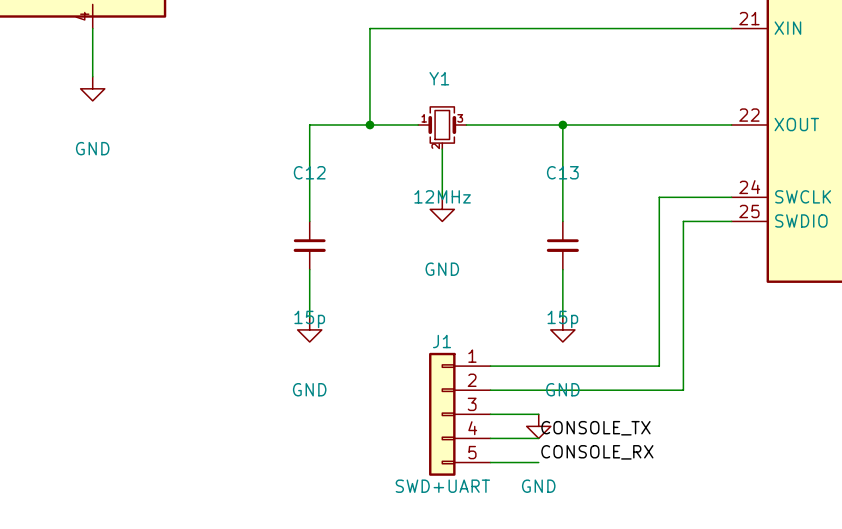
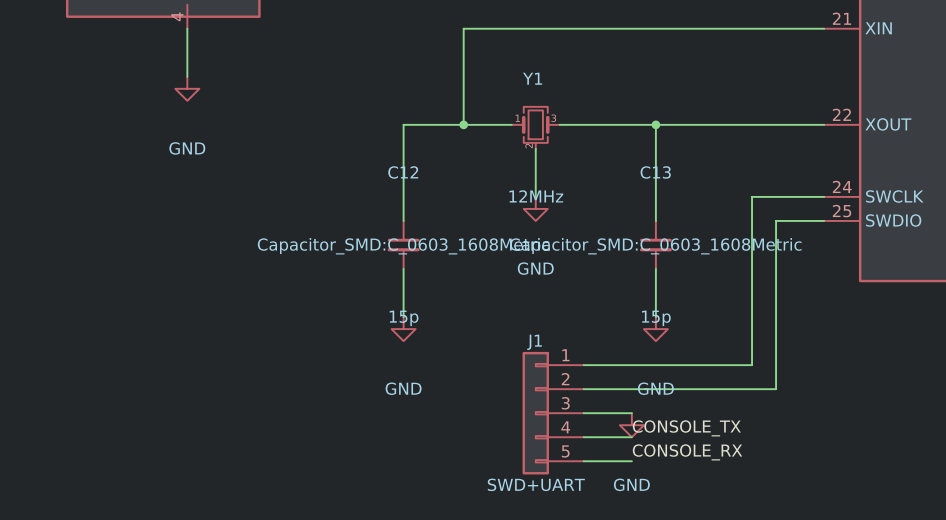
C12 text: none -> Capacitor_SMD:C_0603_1608Metric (403, 246)
C13 text: none -> Capacitor_SMD:C_0603_1608Metric (655, 246)

